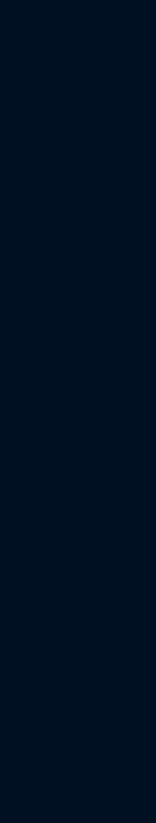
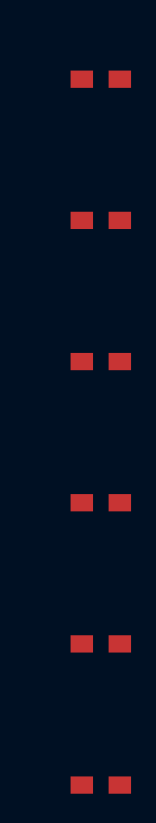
part: none -> (100, 79)
part: none -> (100, 220)
part: none -> (100, 361)
part: none -> (100, 502)
part: none -> (100, 643)
part: none -> (100, 785)

